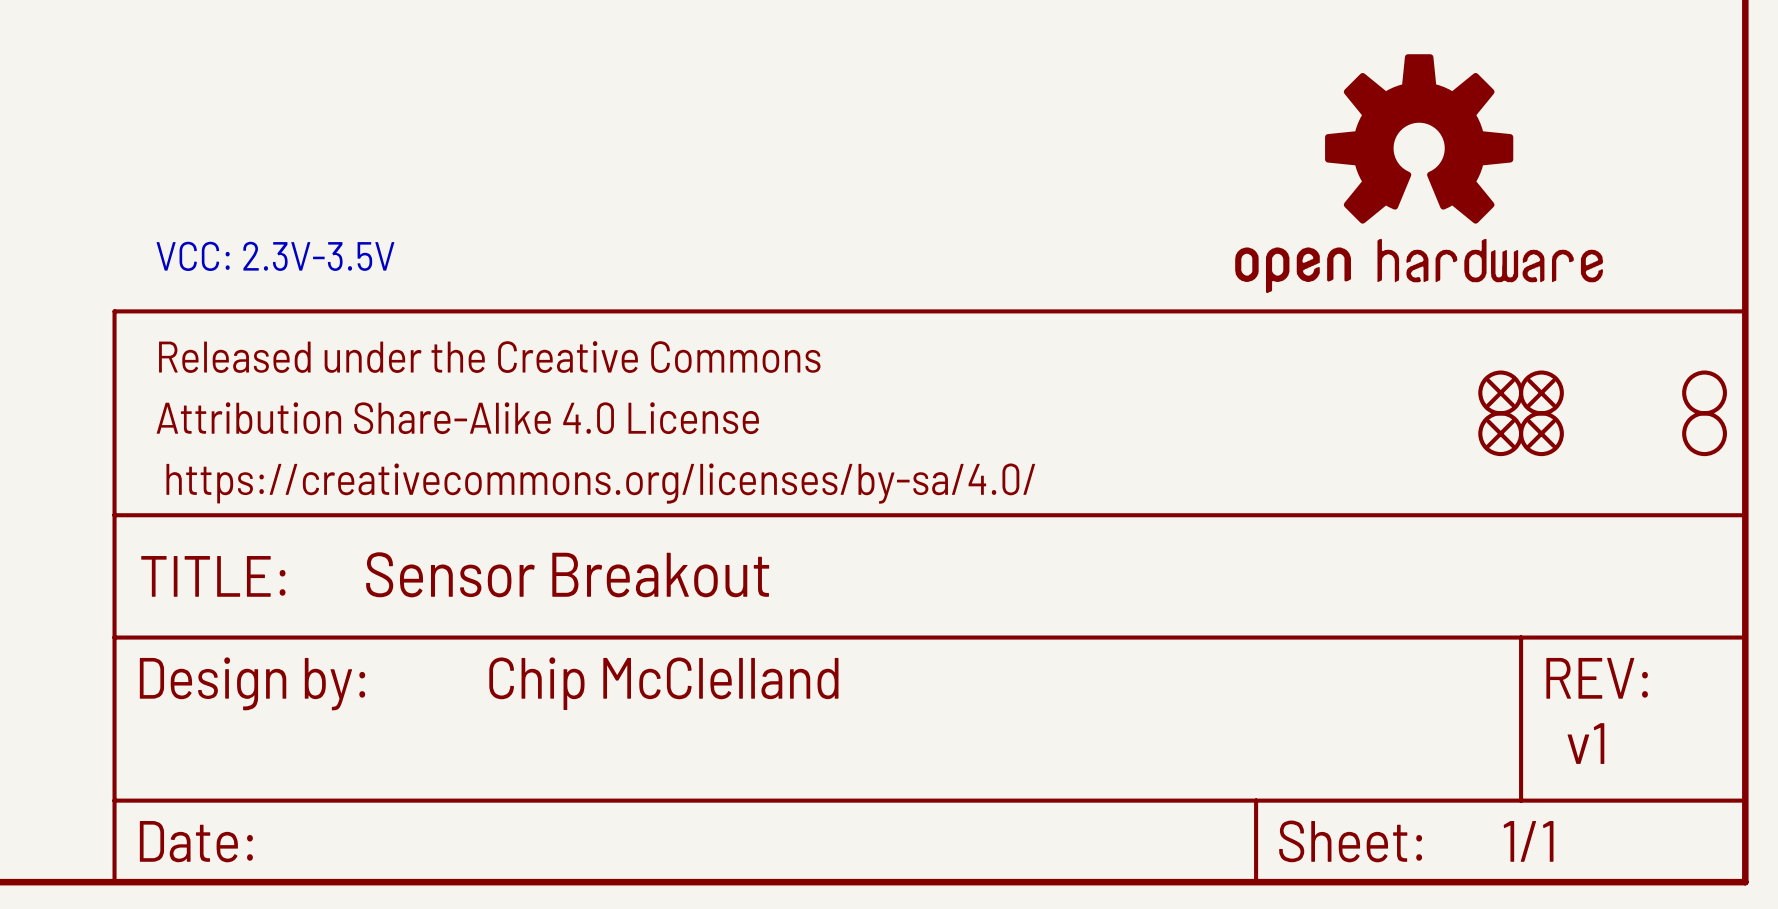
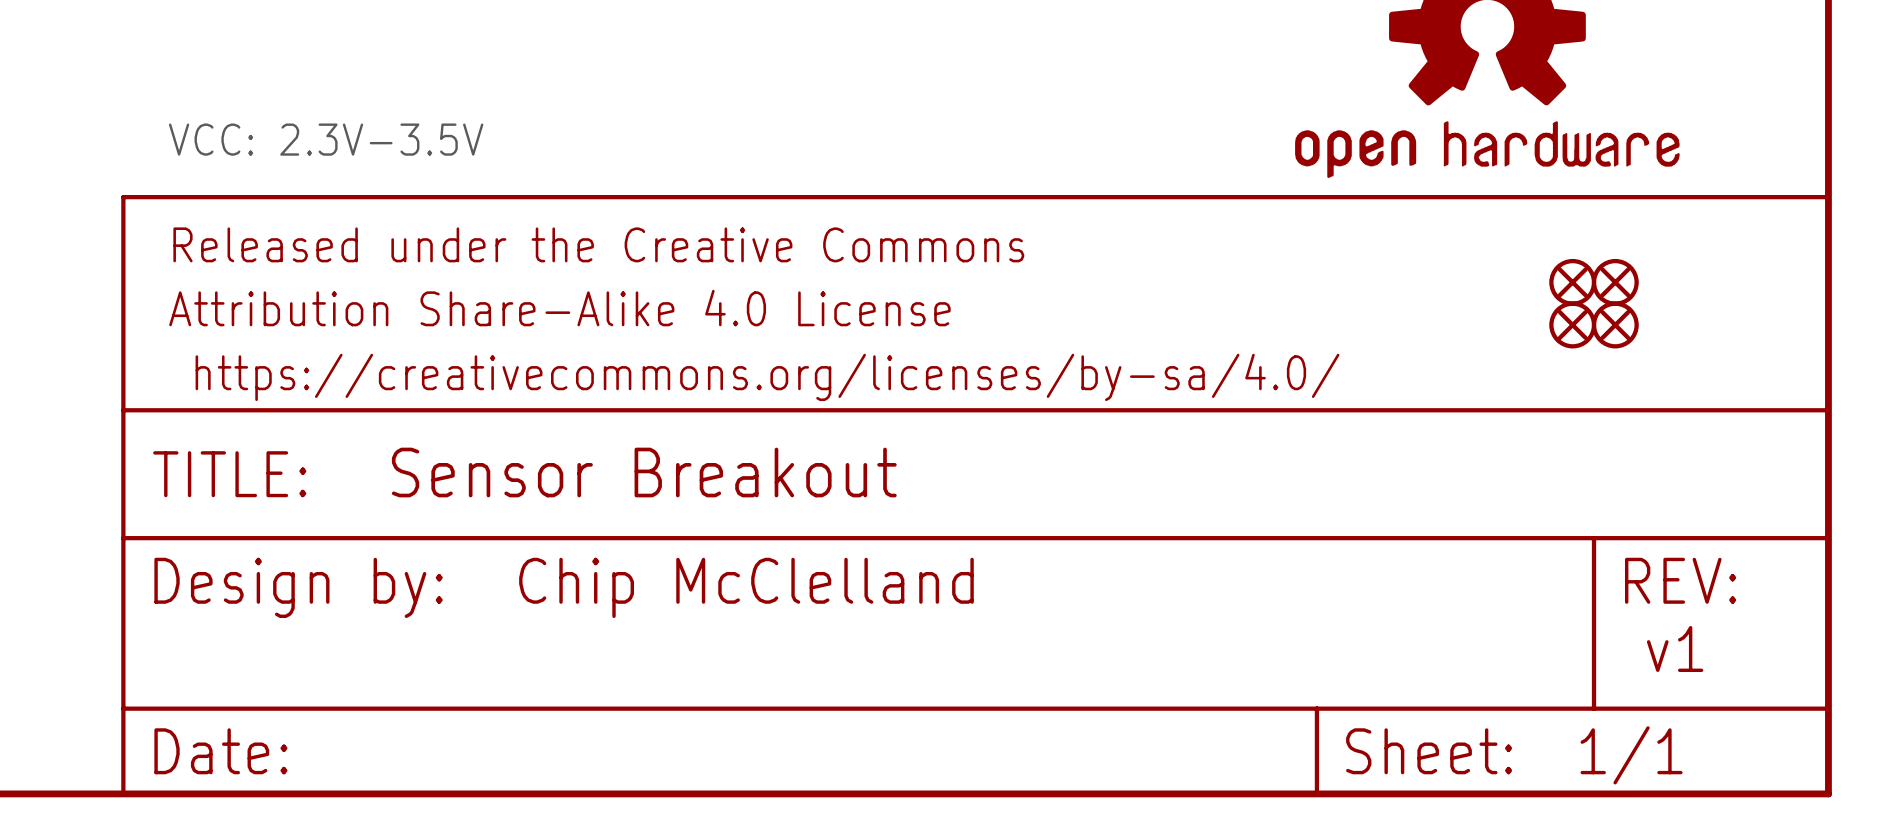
part: (1704, 392) -> none
part: (1704, 433) -> none

